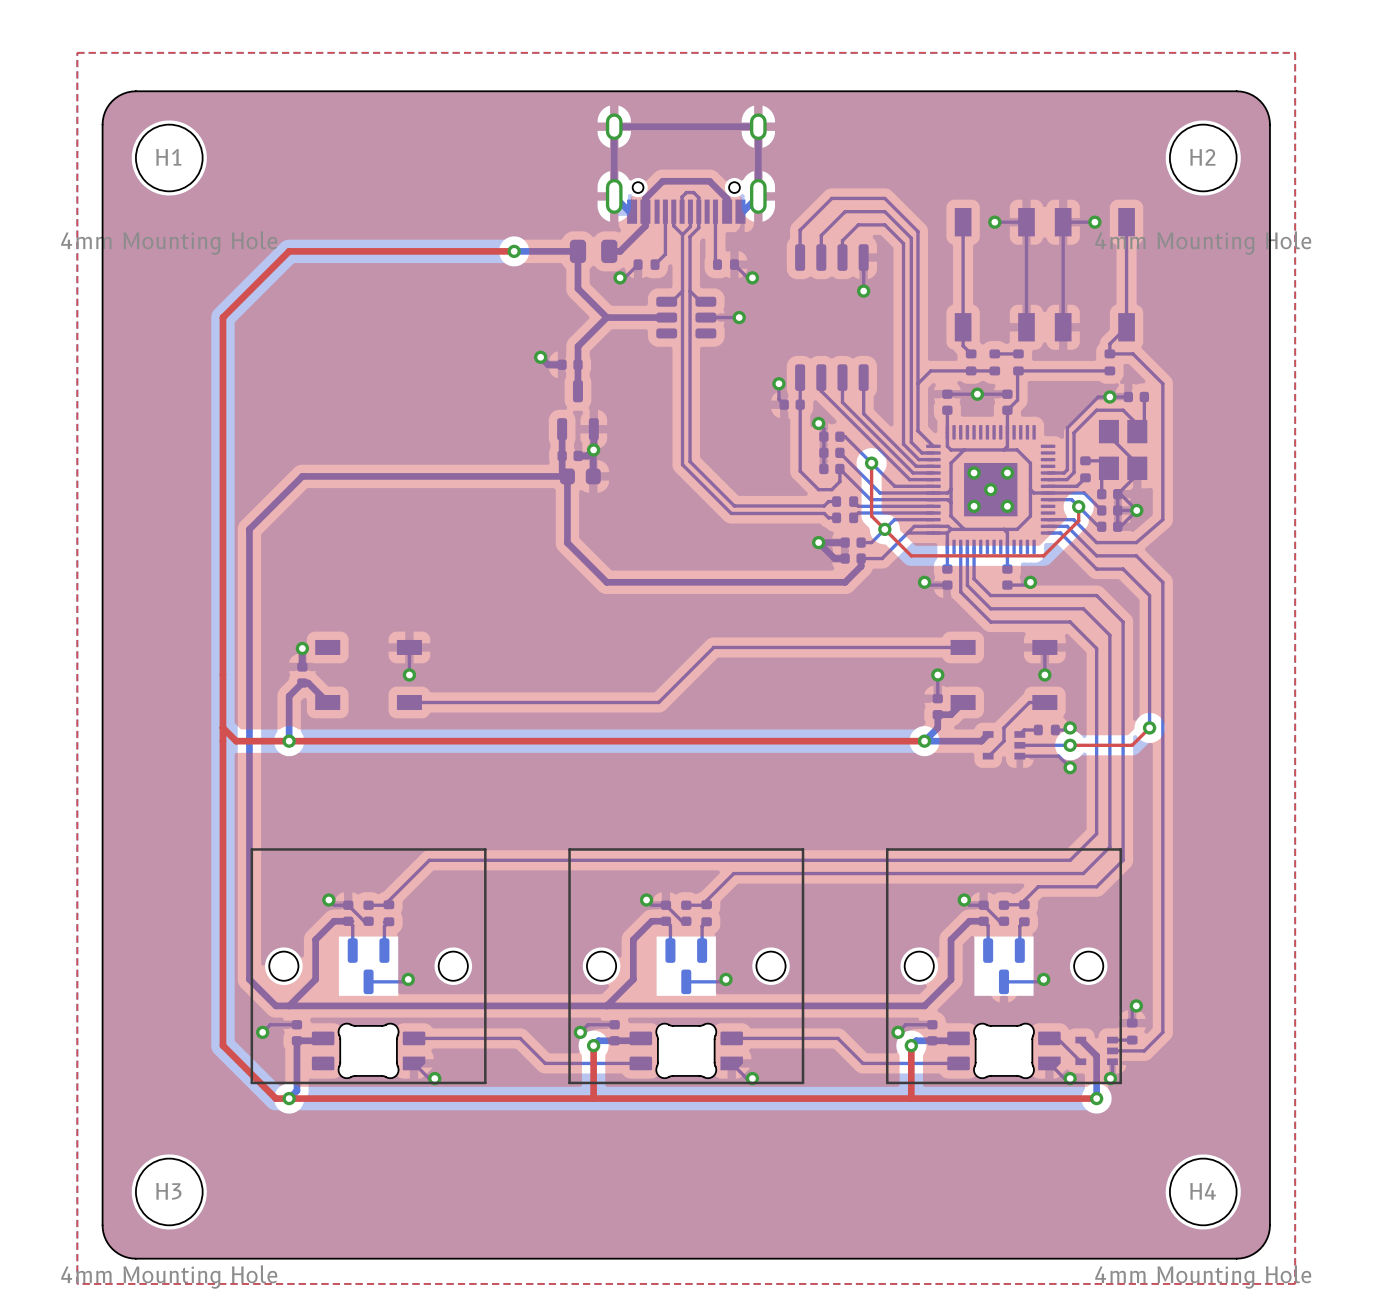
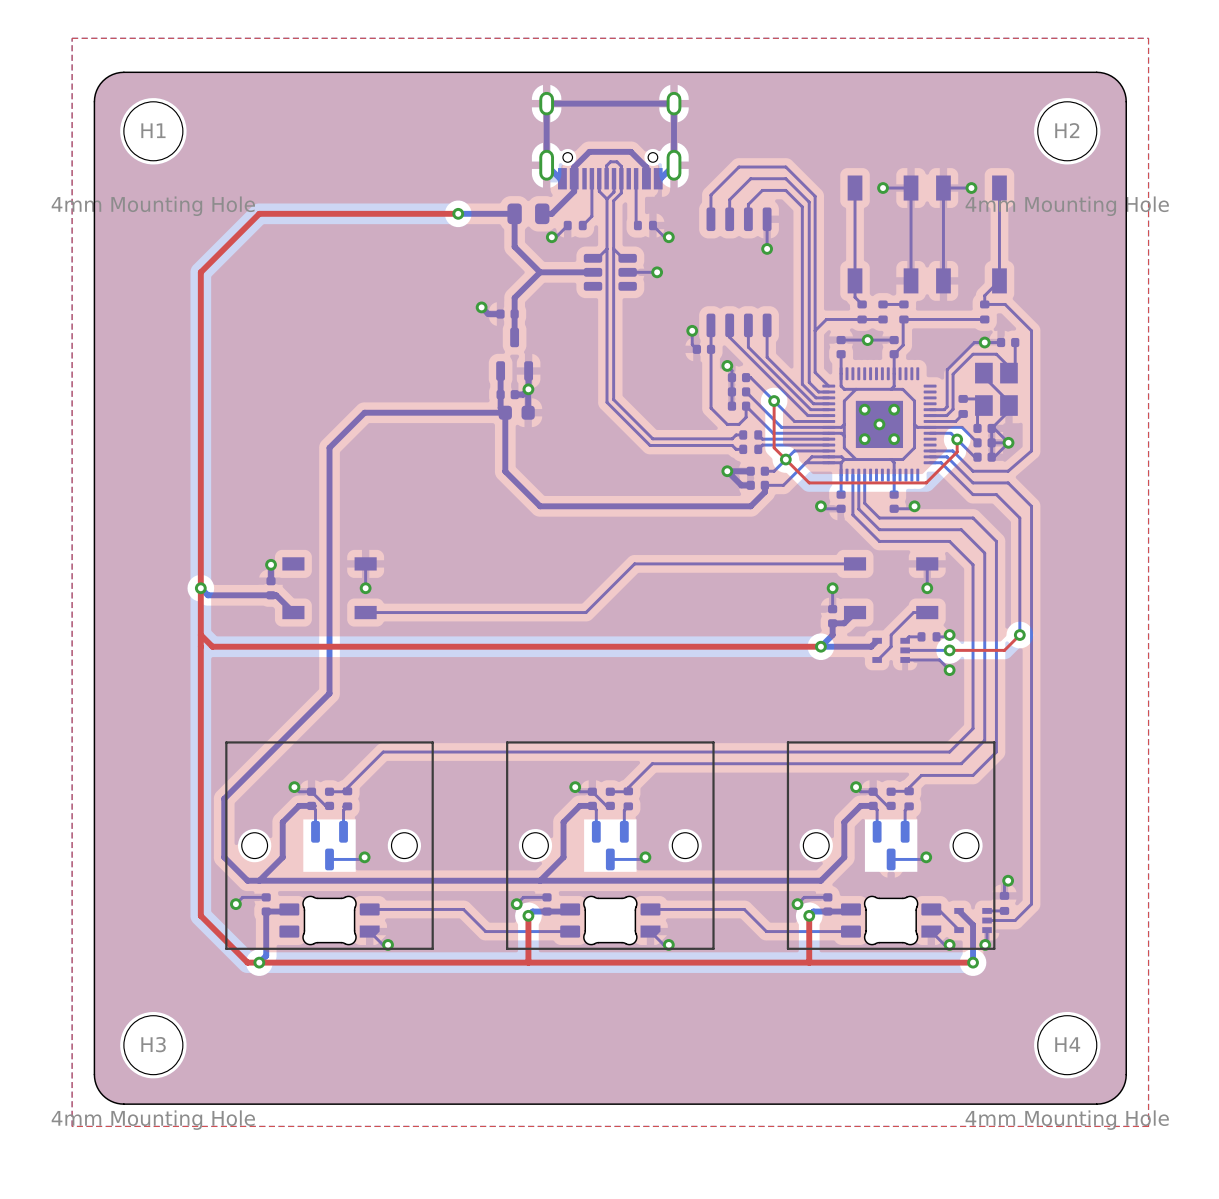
bottom track: (408, 476) (302, 476) (249, 529) (249, 913) -> (364, 412) (329, 447) (329, 693) (224, 798)
bottom track: (302, 682) (289, 696) (289, 741) -> (271, 595) (207, 595) (200, 588)
via position: (289, 741) -> (200, 588)

